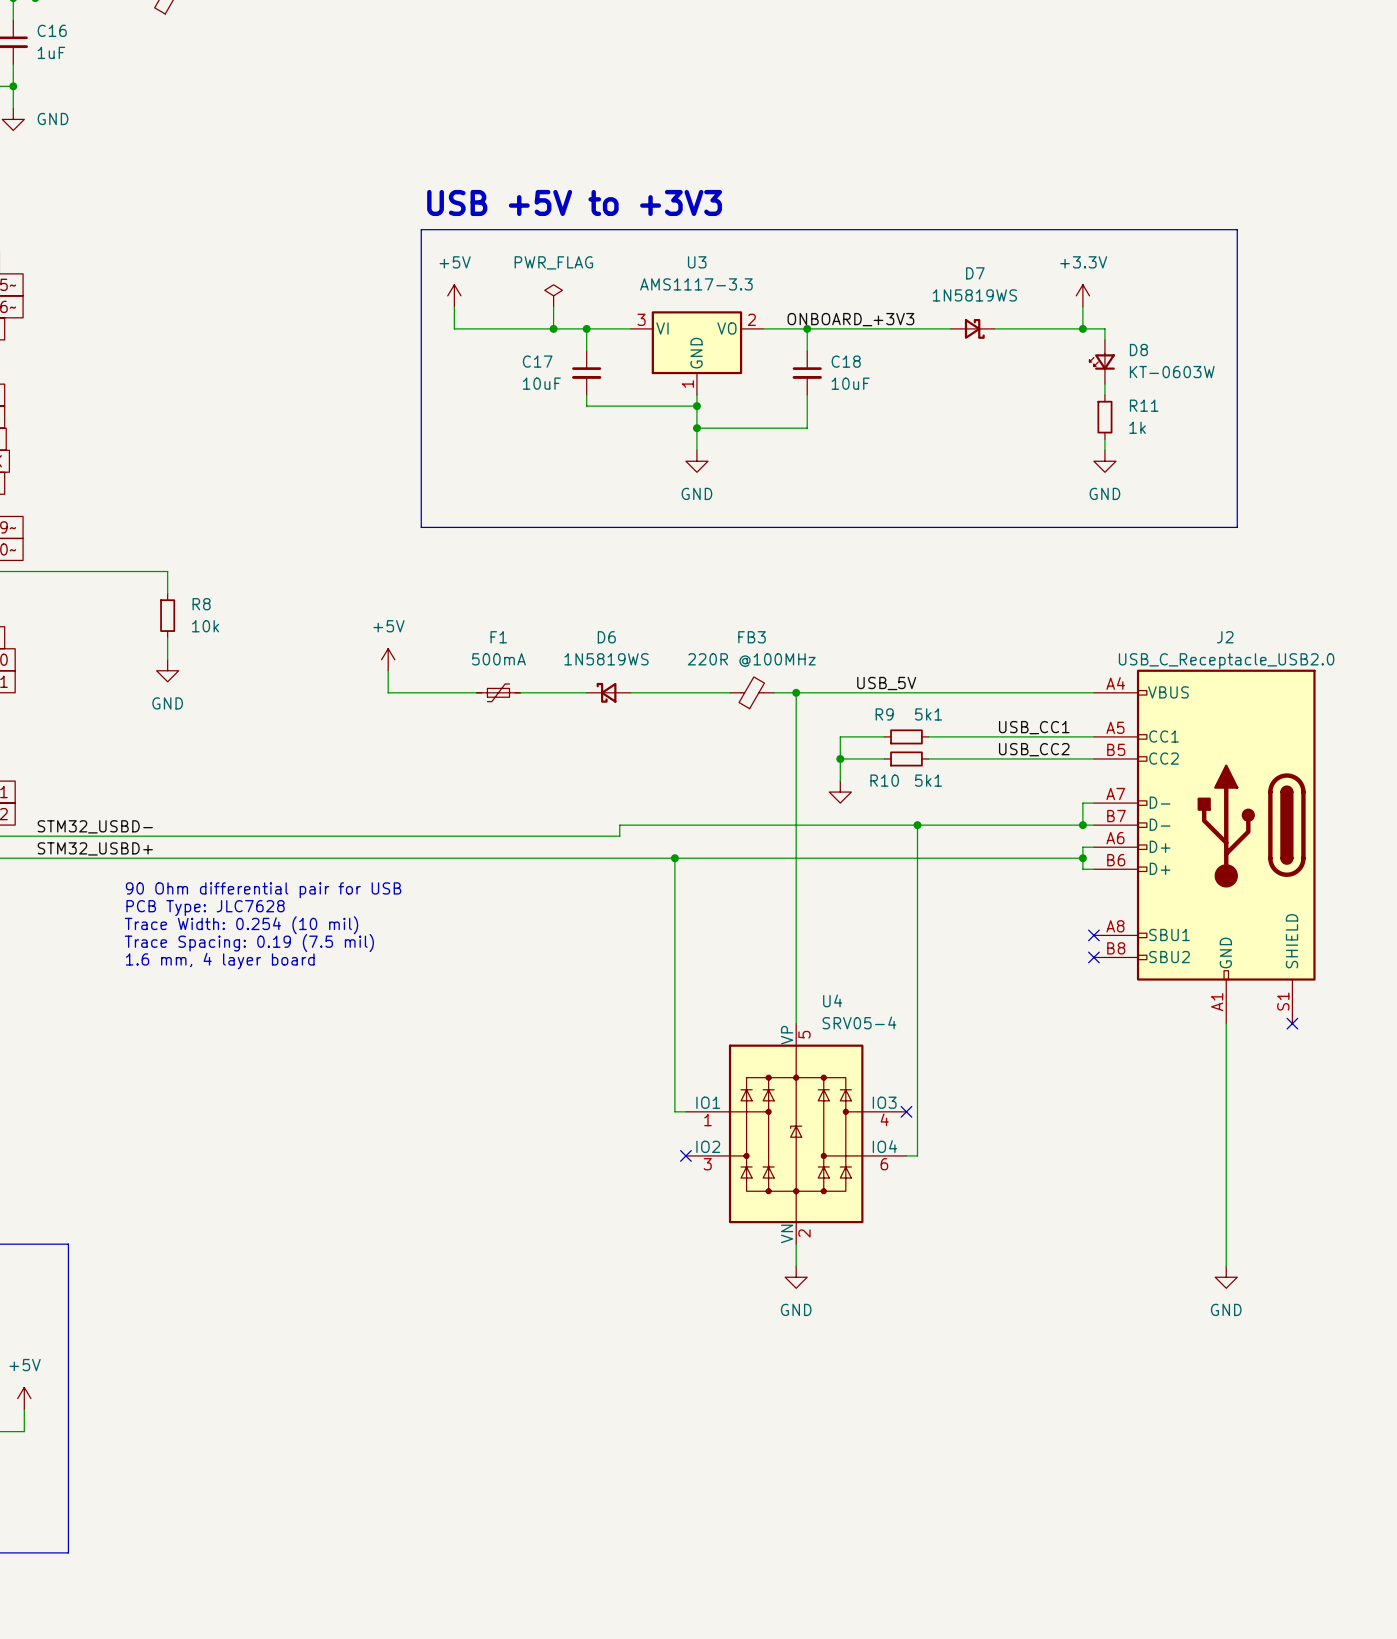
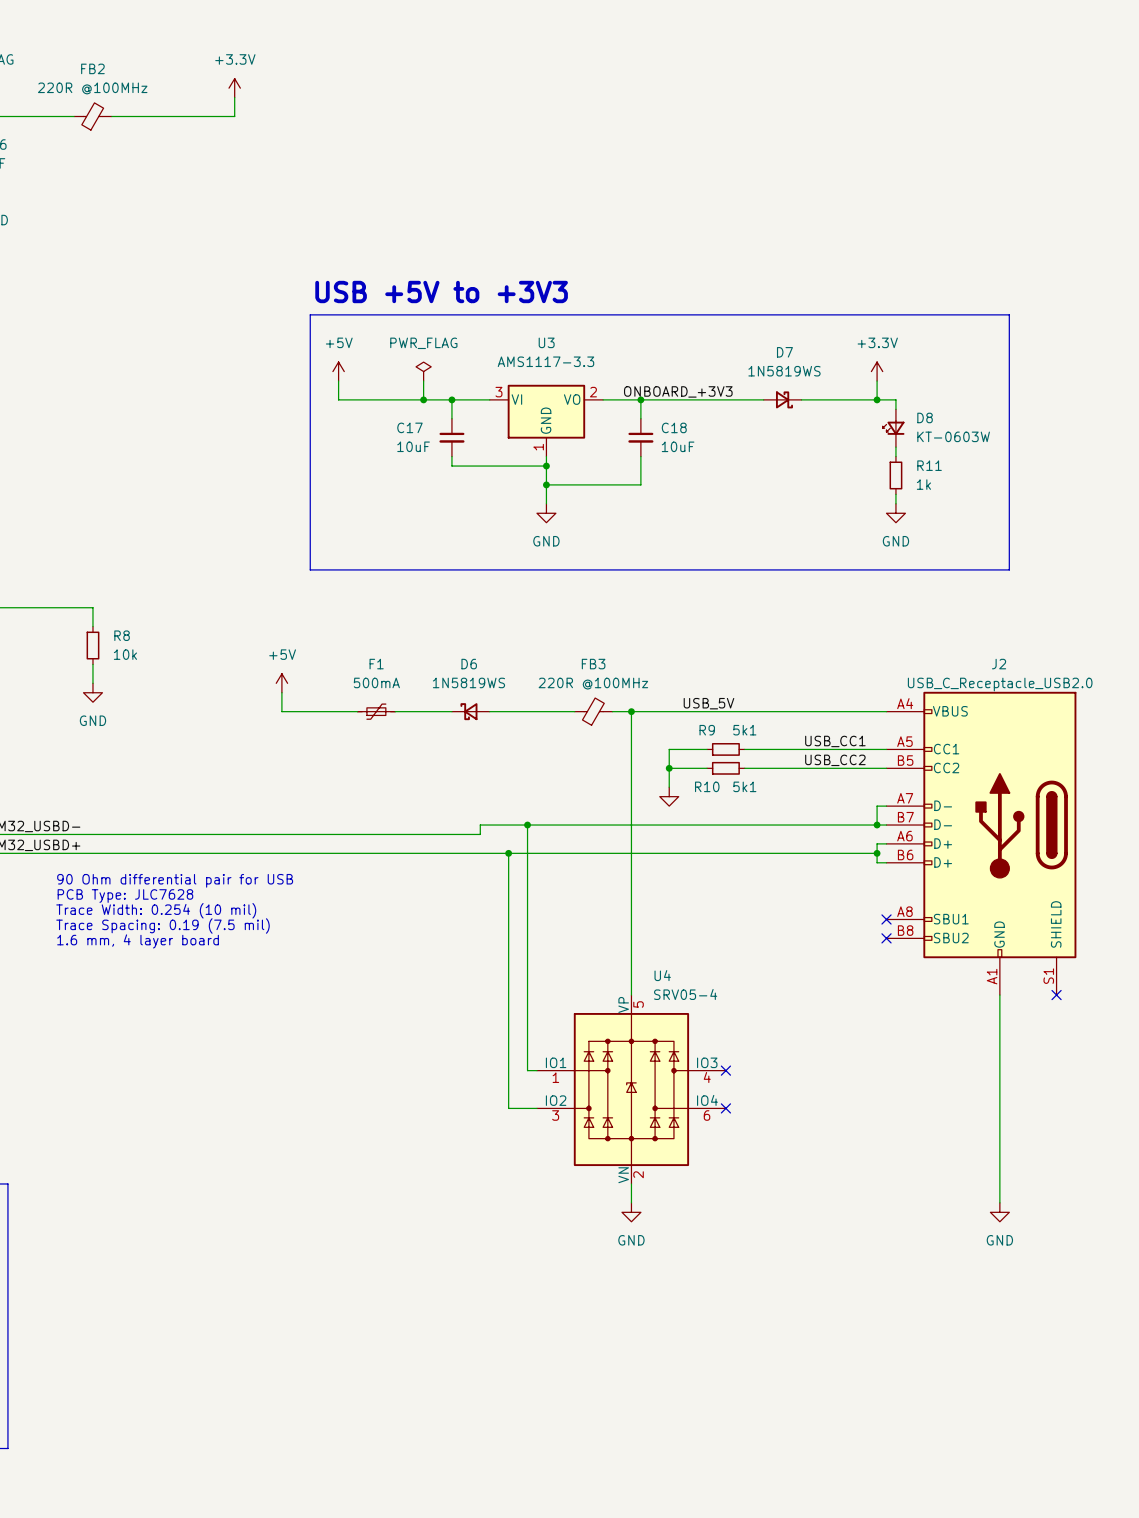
wire: none -> (527, 825) (527, 853)
junction: none -> (527, 825)
wire: (917, 825) (917, 1155) (906, 1155) -> none
junction: (917, 825) -> none
wire: none -> (508, 853) (508, 1108) (536, 1108)
junction: none -> (508, 853)
junction: (674, 858) -> none
no-connect mark: (685, 1155) -> none
no-connect mark: none -> (725, 1108)

